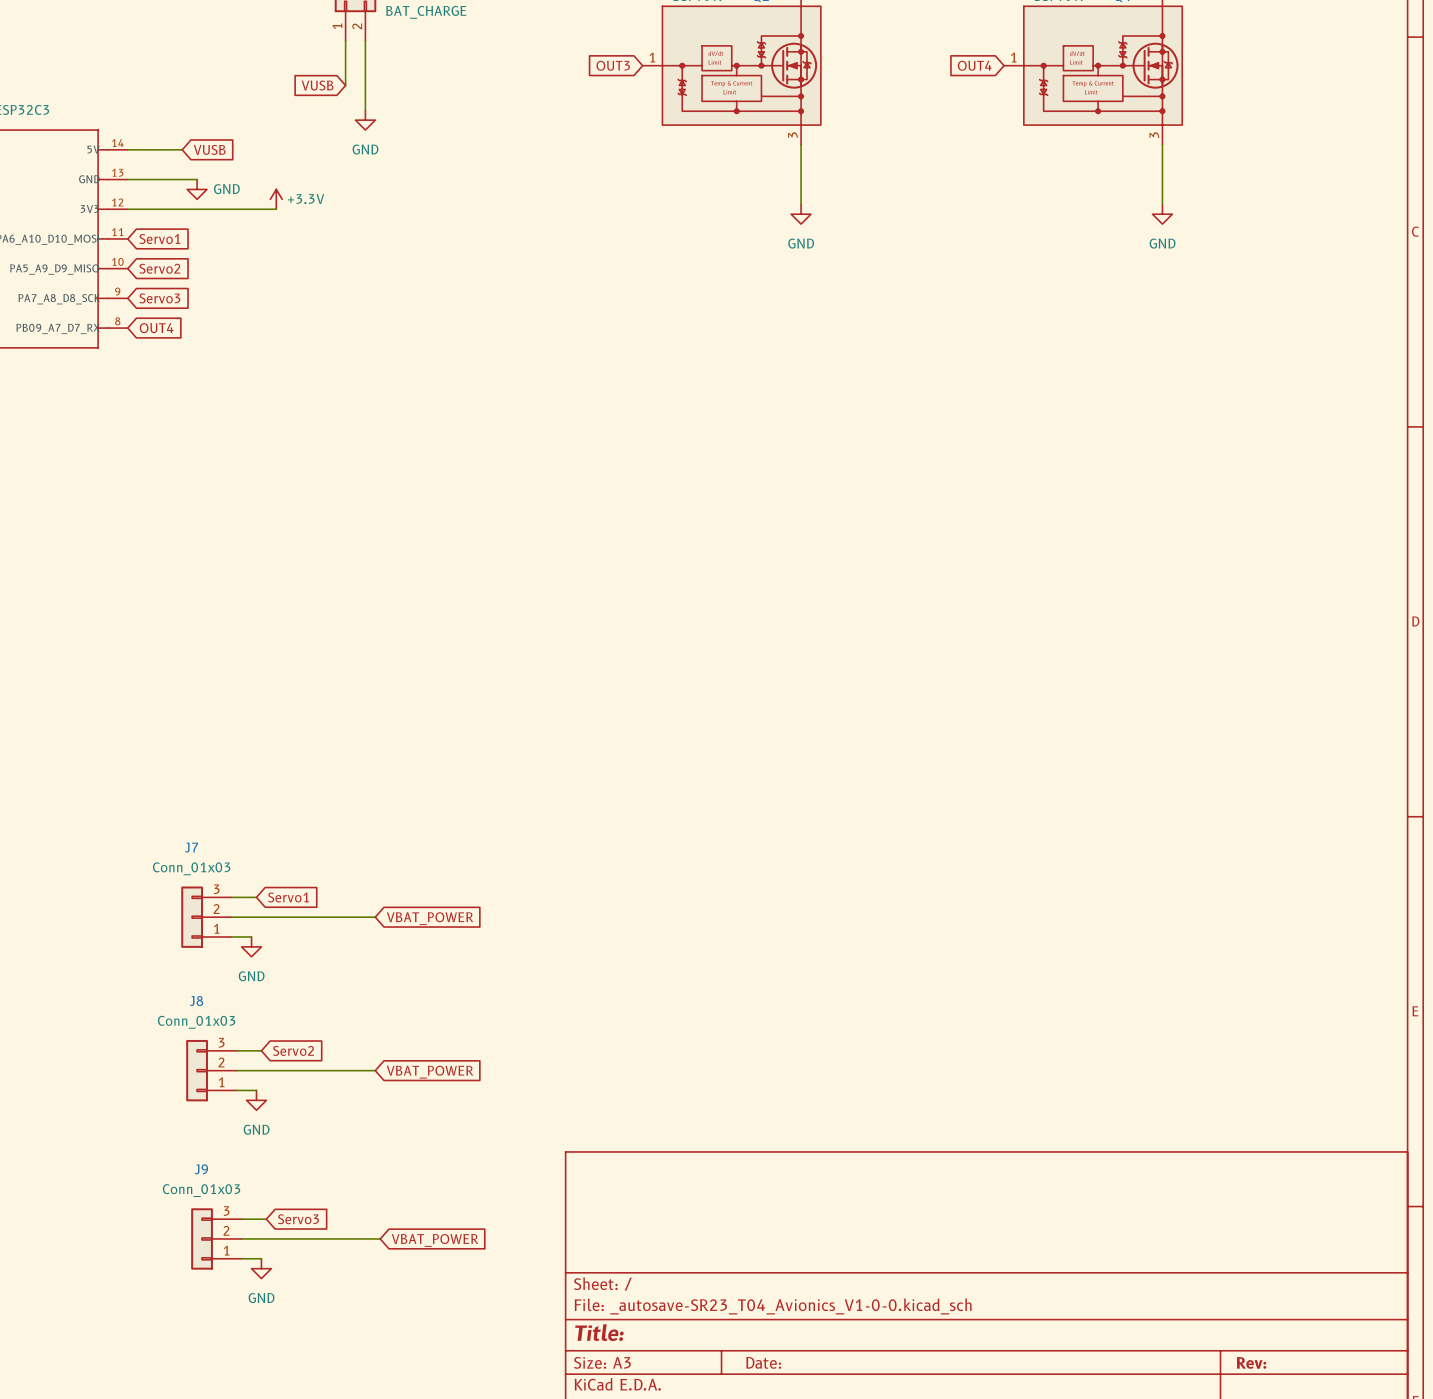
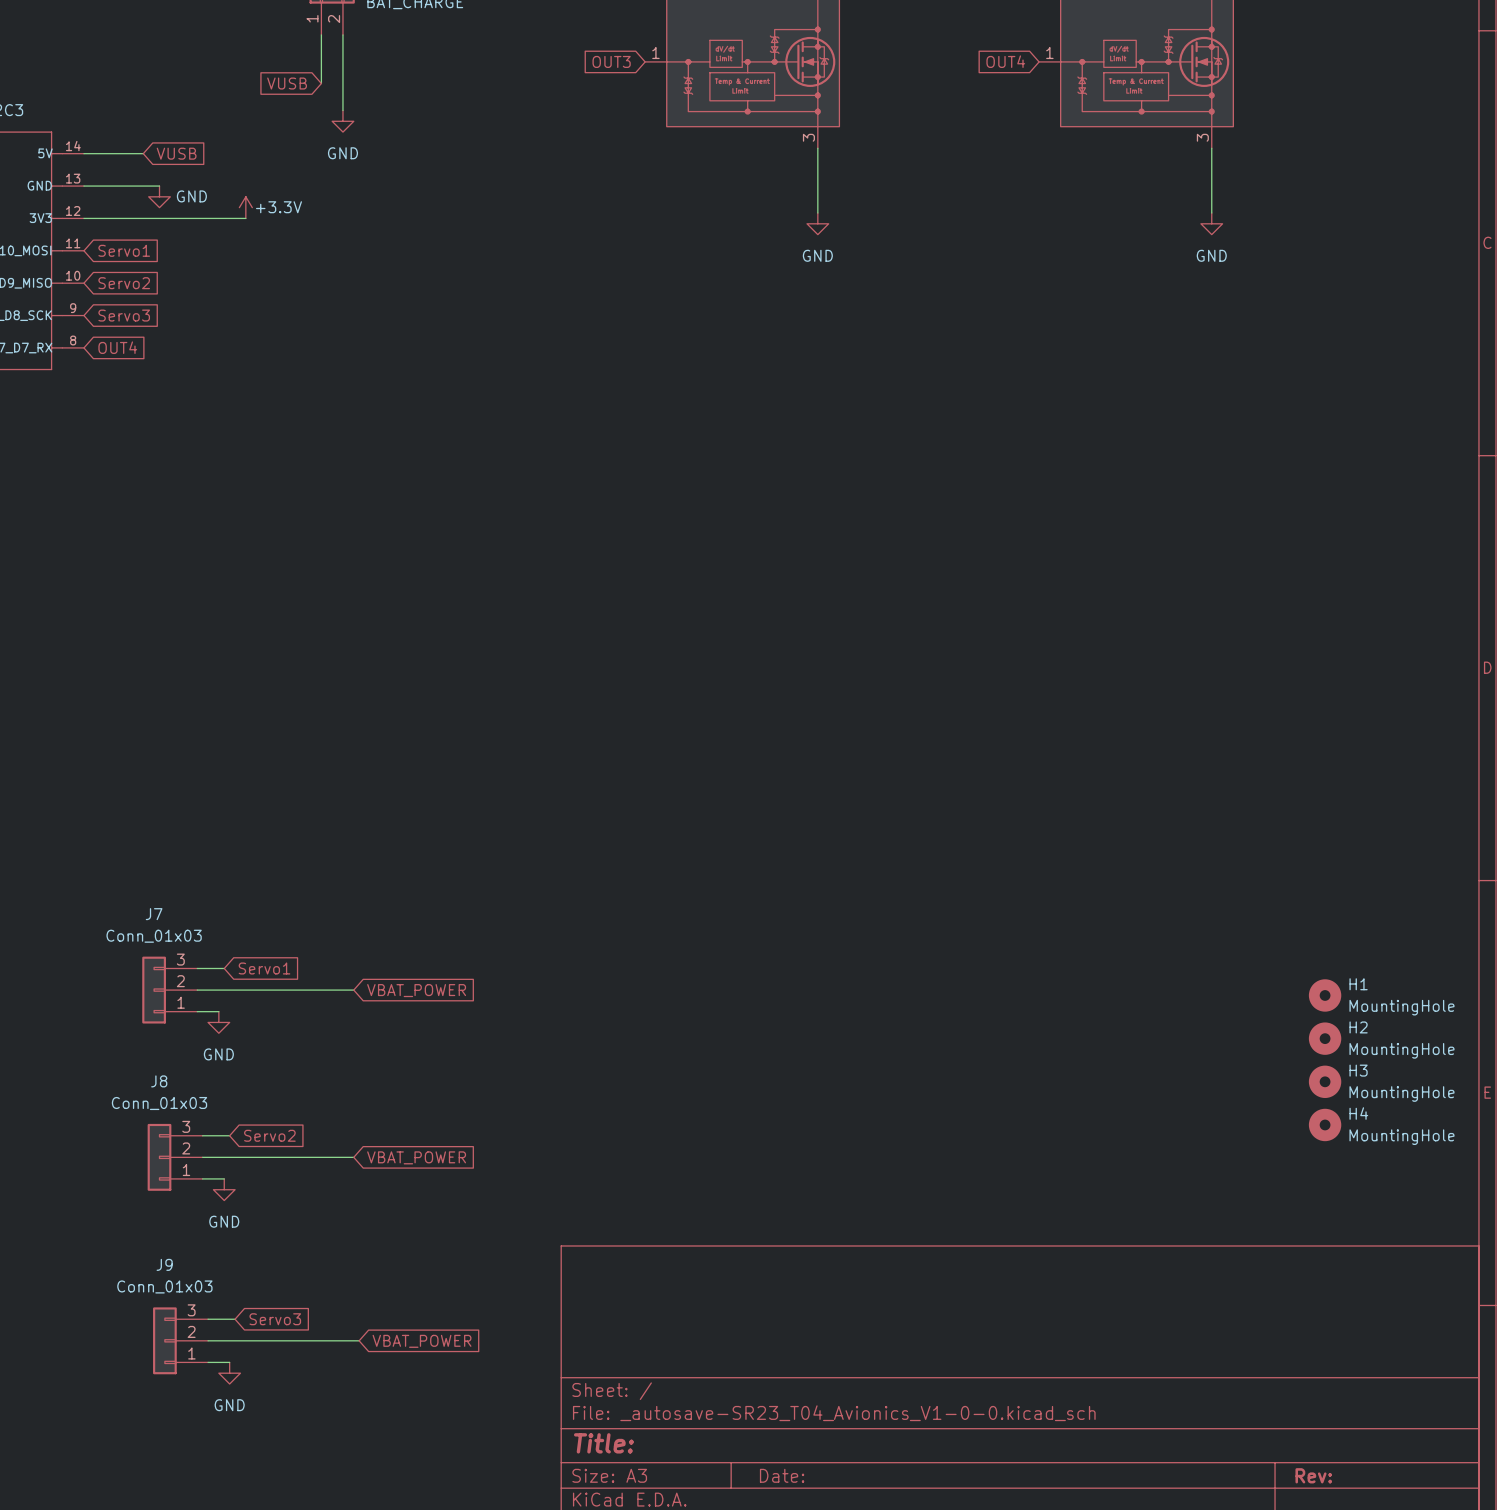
H1: none -> MountingHole (1325, 995)
H2: none -> MountingHole (1325, 1038)
H3: none -> MountingHole (1325, 1081)
H4: none -> MountingHole (1325, 1124)

